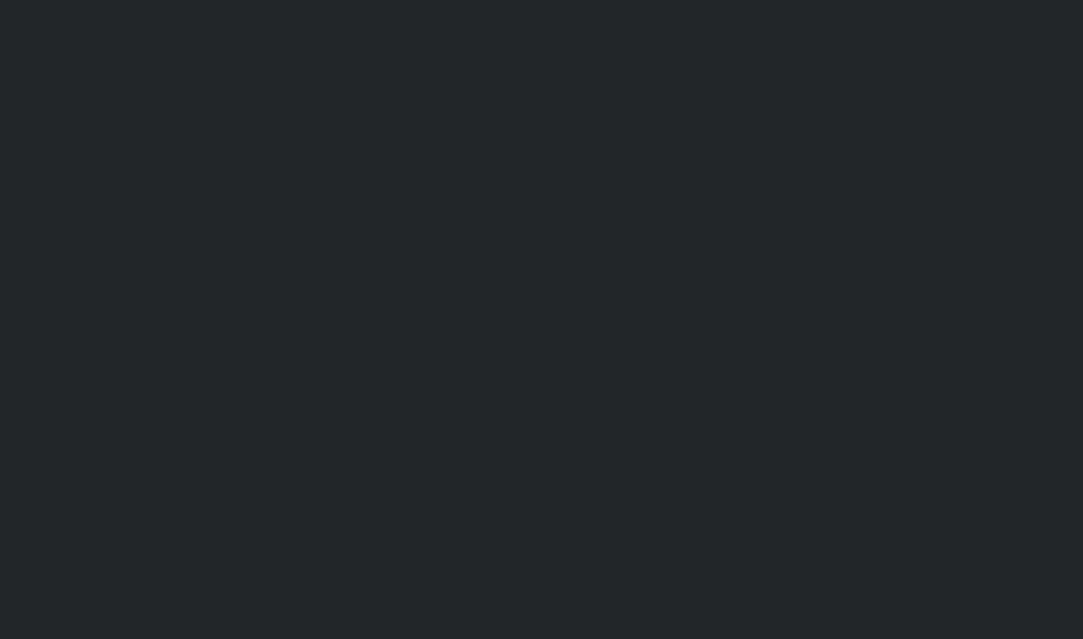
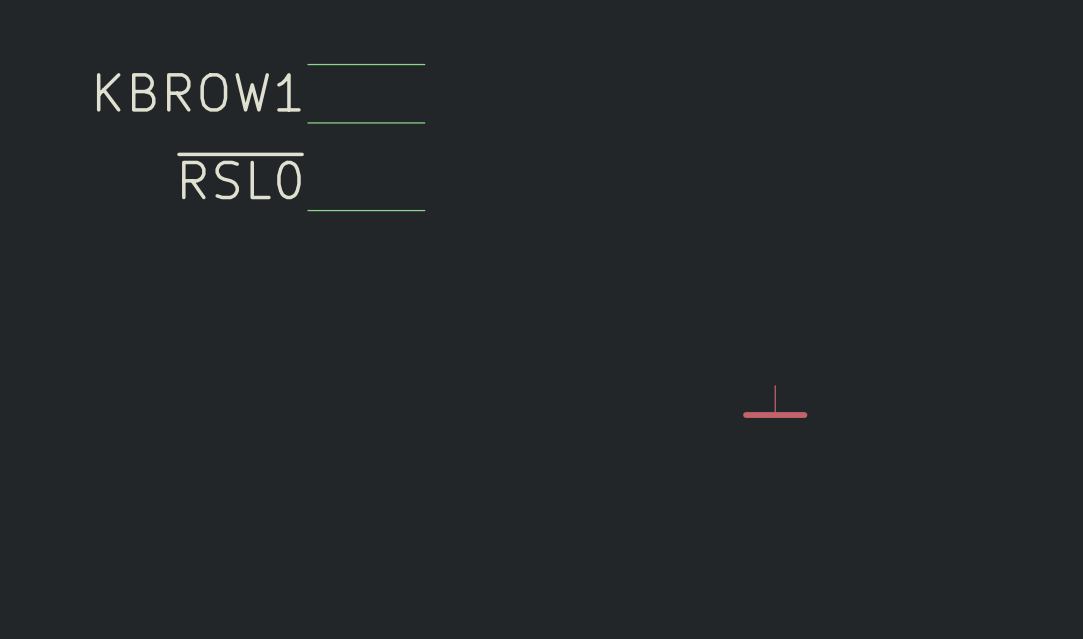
wire: none -> (307, 64) (424, 64)
label: none -> KBROW1 (198, 92)
wire: none -> (307, 122) (424, 122)
label: none -> ~{RSL0} (240, 175)
wire: none -> (307, 210) (424, 210)
power symbol: none -> (775, 401)

